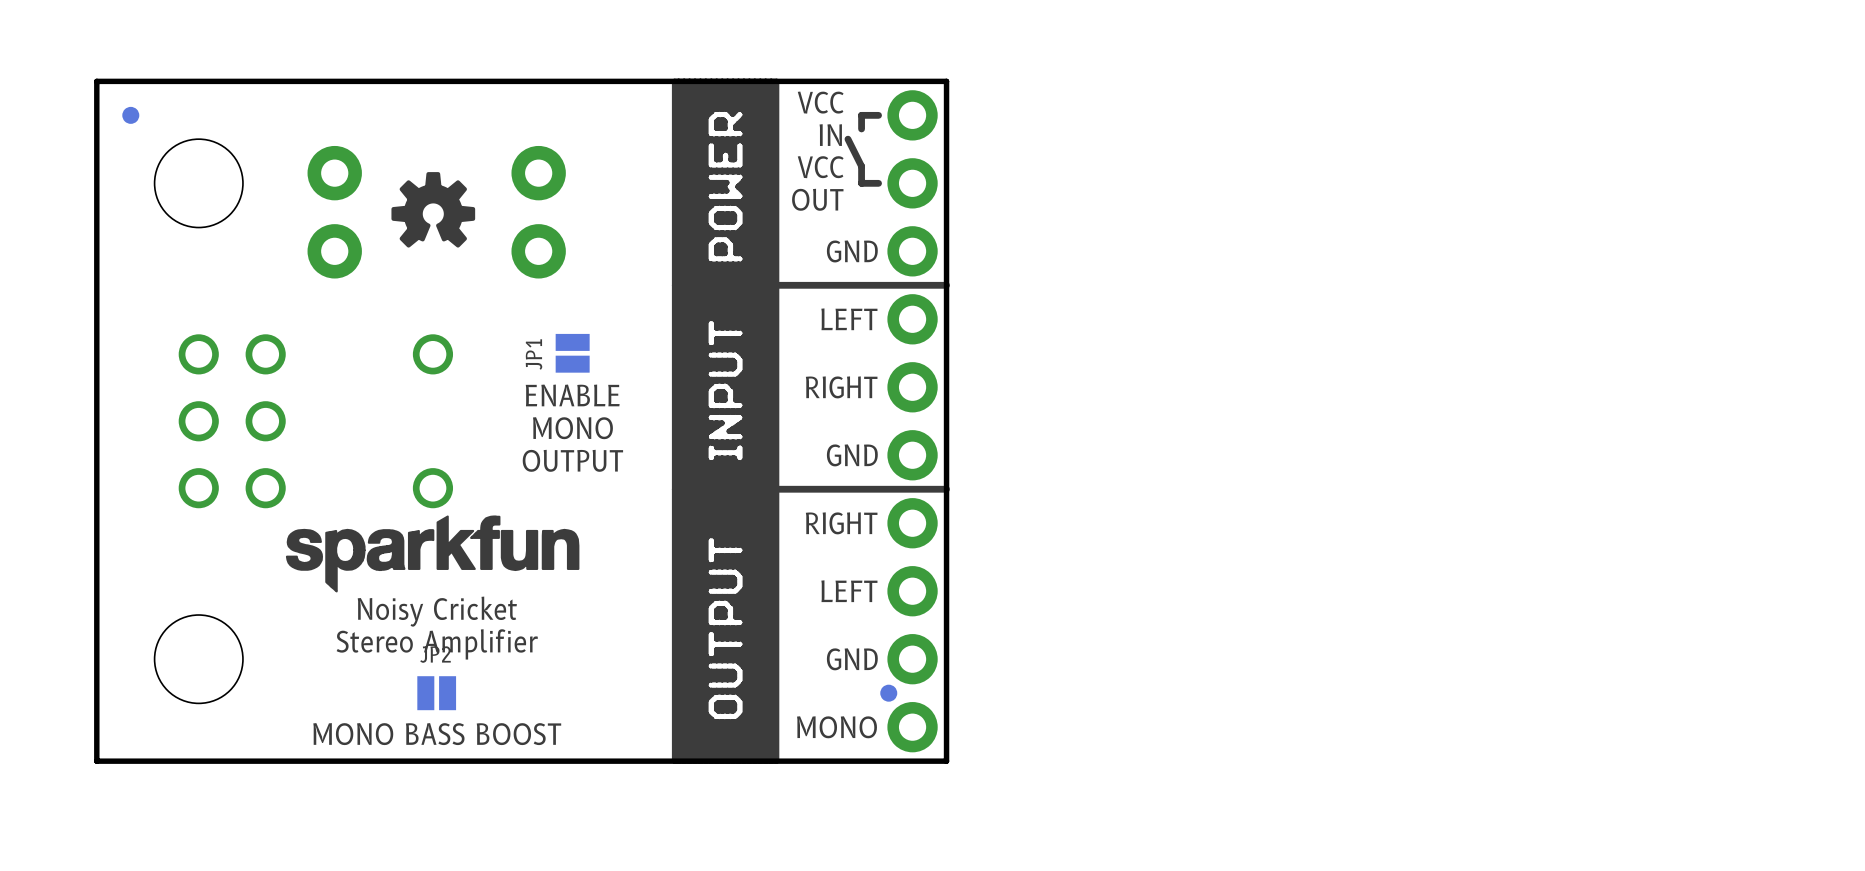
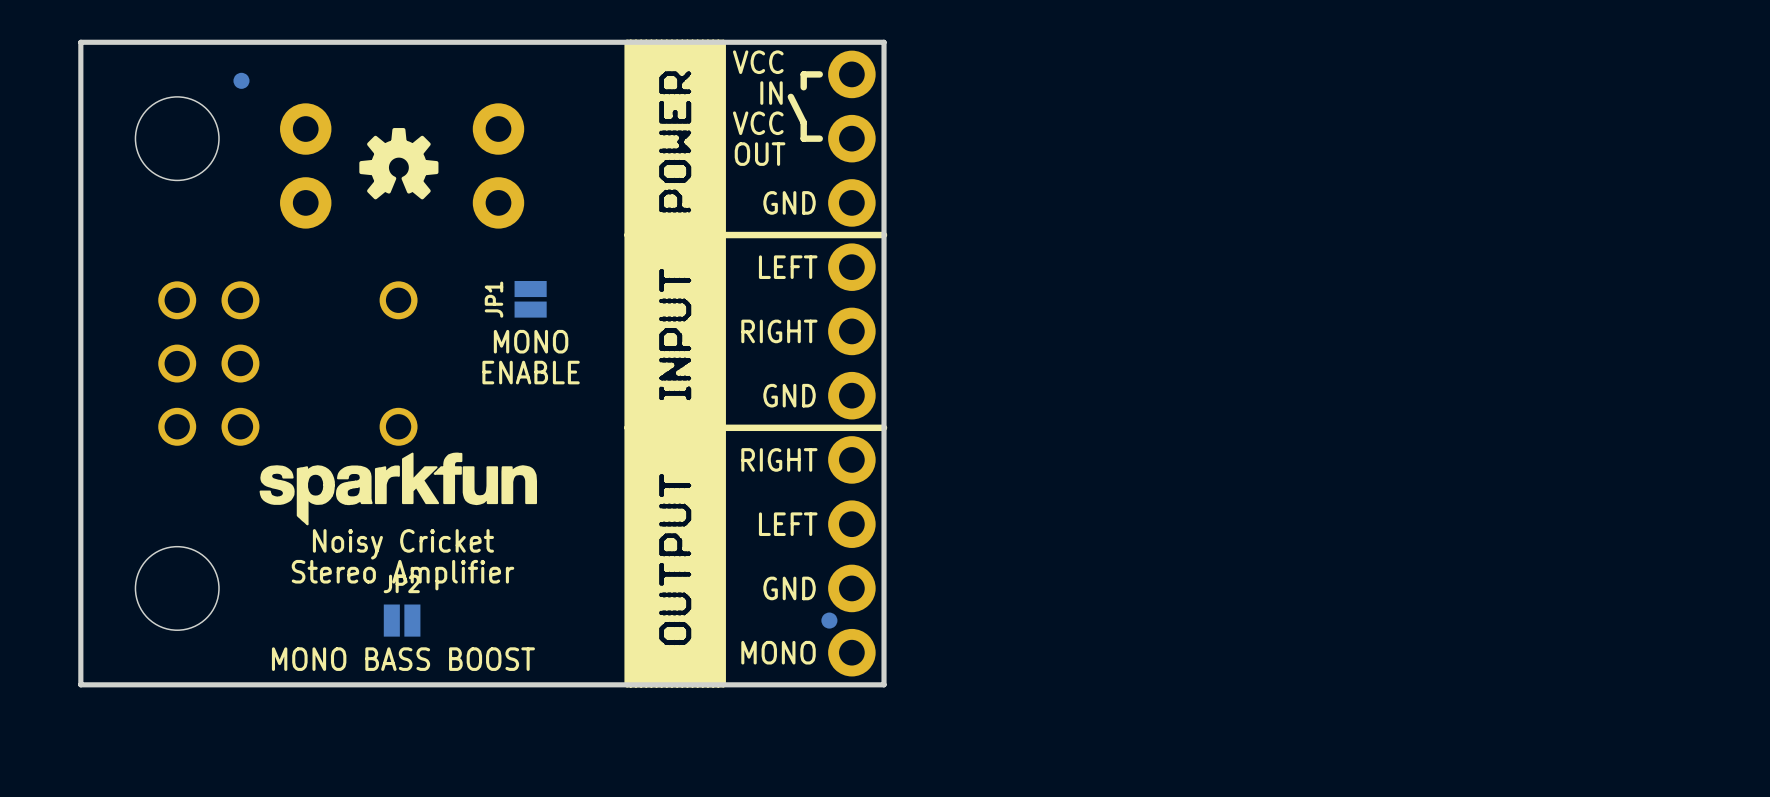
part position: (130, 115) -> (241, 80)
text: ENABLE (572, 395) -> MONO (531, 341)
text: MONO (572, 428) -> ENABLE (531, 372)
text: OUTPUT (572, 460) -> none

